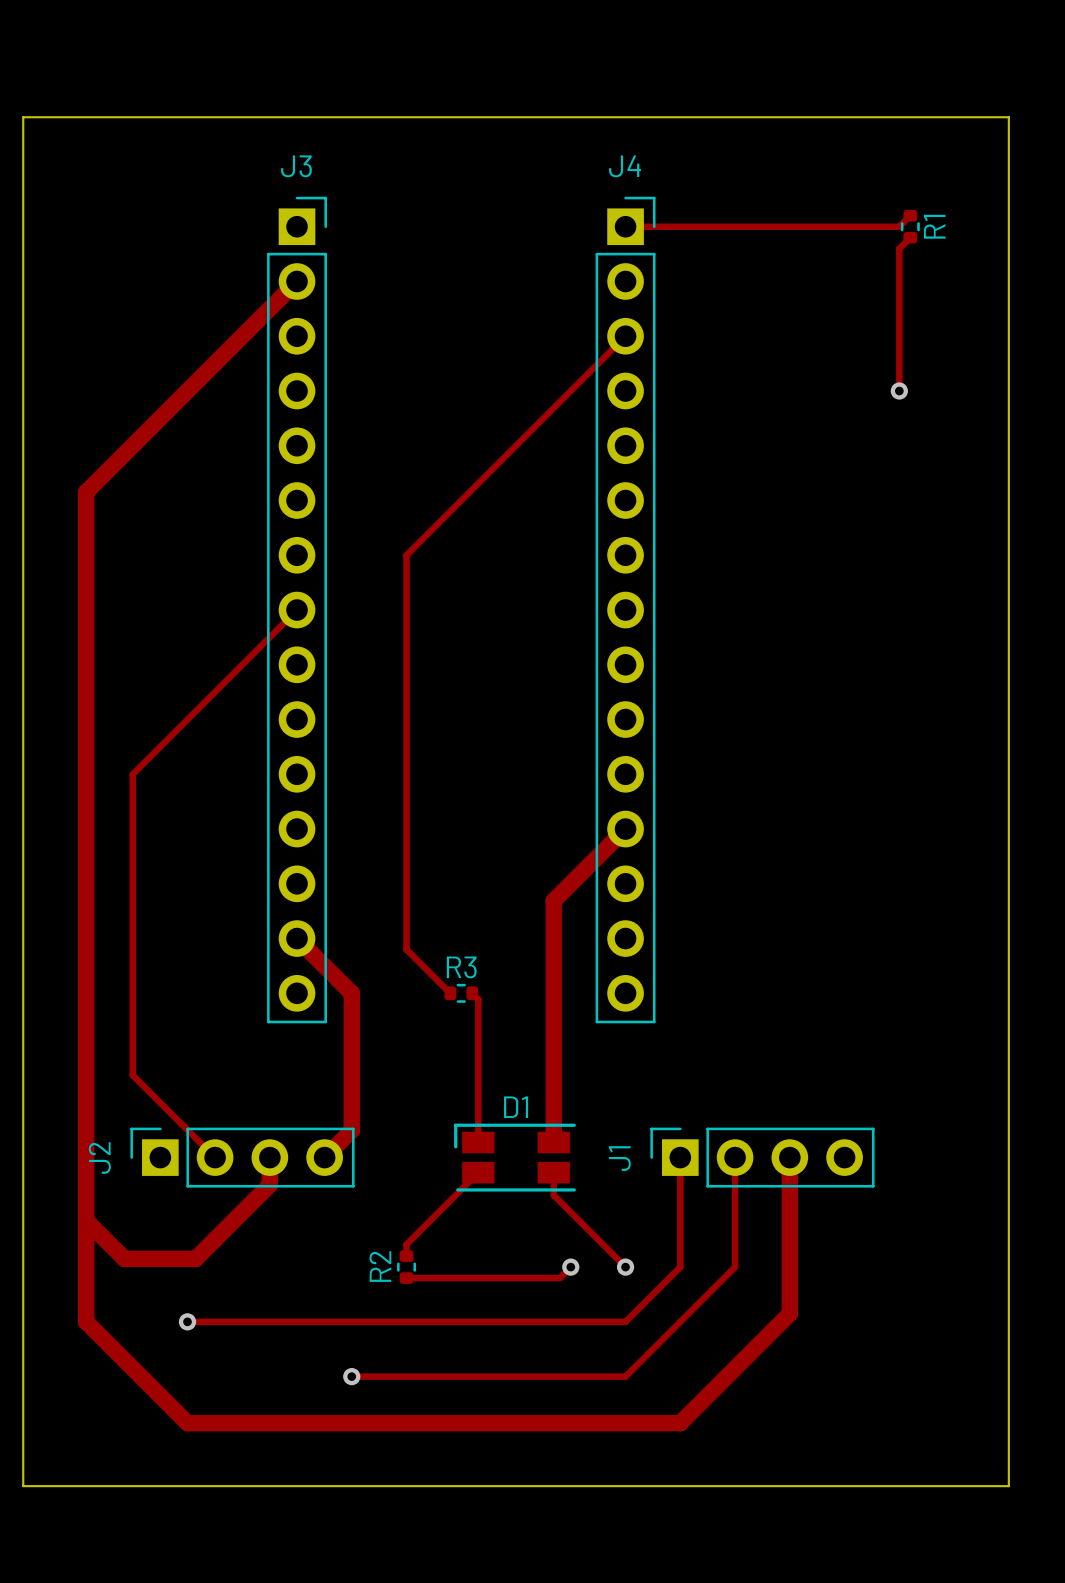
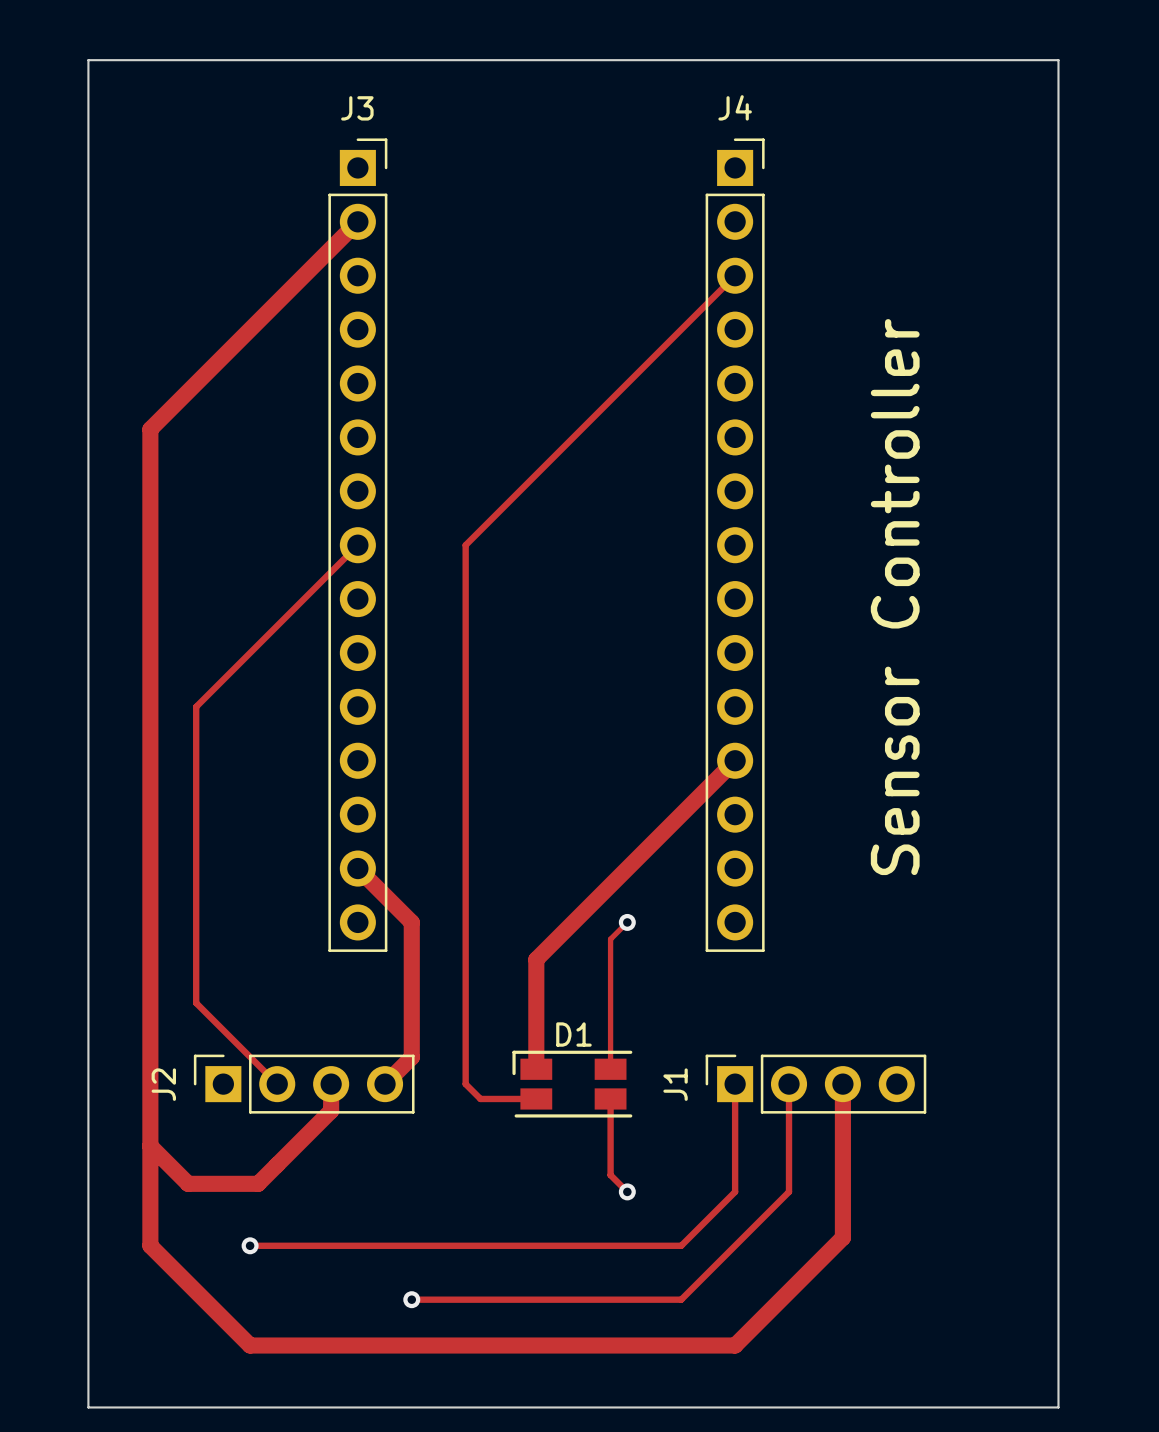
track: (910, 215) (899, 226) (625, 226) -> none
R1: (910, 226) -> none
track: (910, 237) (899, 248) (899, 391) -> none
track: (625, 336) (406, 555) (406, 610) -> (735, 275) (465, 545)
via: (899, 391) -> none
J4 position: (625, 610) -> (735, 545)
text: none -> Sensor Controller (895, 597)
track: (625, 829) (553, 900) (553, 1010) -> (627, 922) (610, 939)
track: (406, 949) (450, 993) -> (465, 879) (465, 1084) (480, 1098) (536, 1098)
R3: (461, 993) -> none
track: (472, 993) (478, 999) (478, 1031) -> (735, 760) (536, 959)
via: none -> (627, 922)
track width: thick (553, 1010) (553, 1142) -> thin (610, 939) (610, 1069)
track width: thin (478, 1031) (478, 1142) -> thick (536, 959) (536, 1069)
track: (478, 1172) (406, 1244) (406, 1256) -> none
track: (553, 1195) (625, 1267) -> (610, 1121) (610, 1175) (627, 1191)
R2: (406, 1267) -> none
track: (570, 1267) (559, 1278) (406, 1278) -> none
via: (625, 1267) -> none

